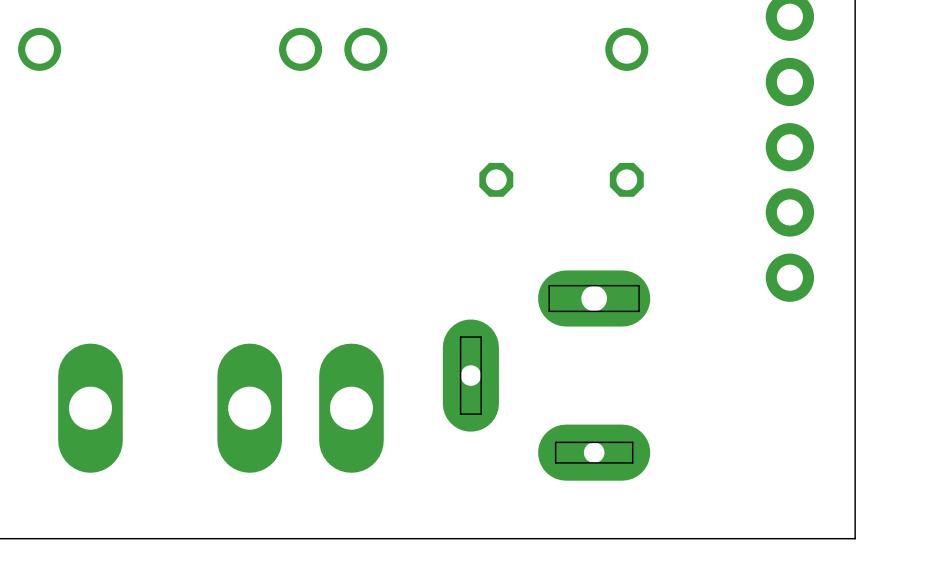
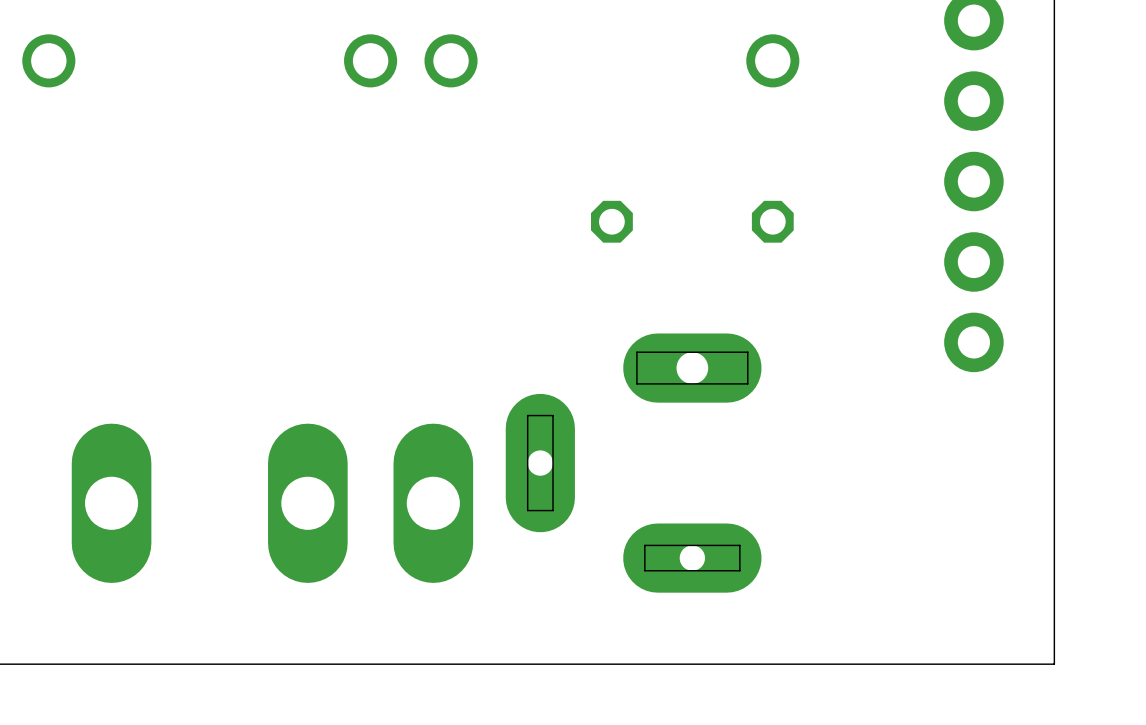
part position: (546, 375) -> (633, 463)

